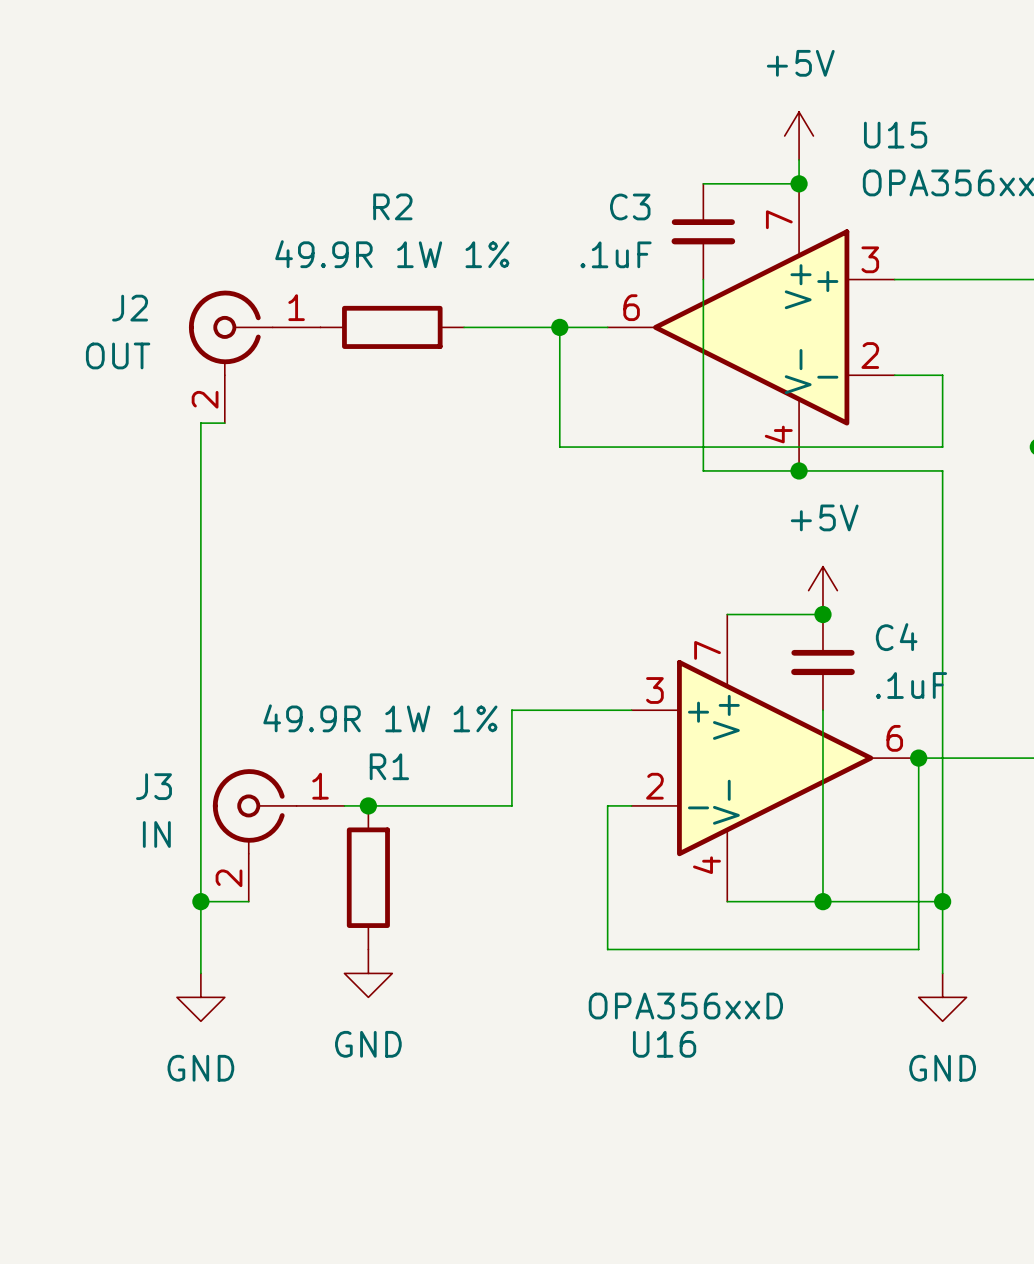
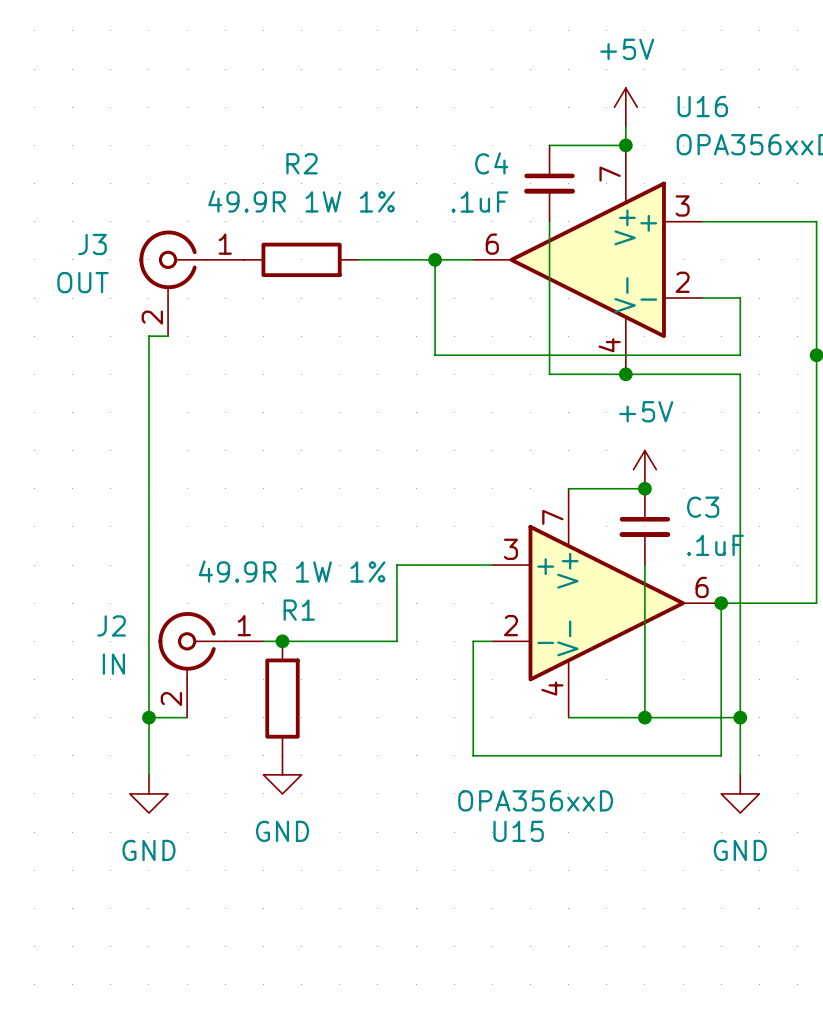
U15 name: U15 (895, 135) -> U16 (702, 106)
C3 name: C3 (630, 206) -> C4 (491, 163)
J2 name: J2 (130, 308) -> J3 (92, 244)
C4 name: C4 (896, 637) -> C3 (703, 507)
J3 name: J3 (153, 786) -> J2 (111, 625)
U16 name: U16 (664, 1044) -> U15 (518, 831)

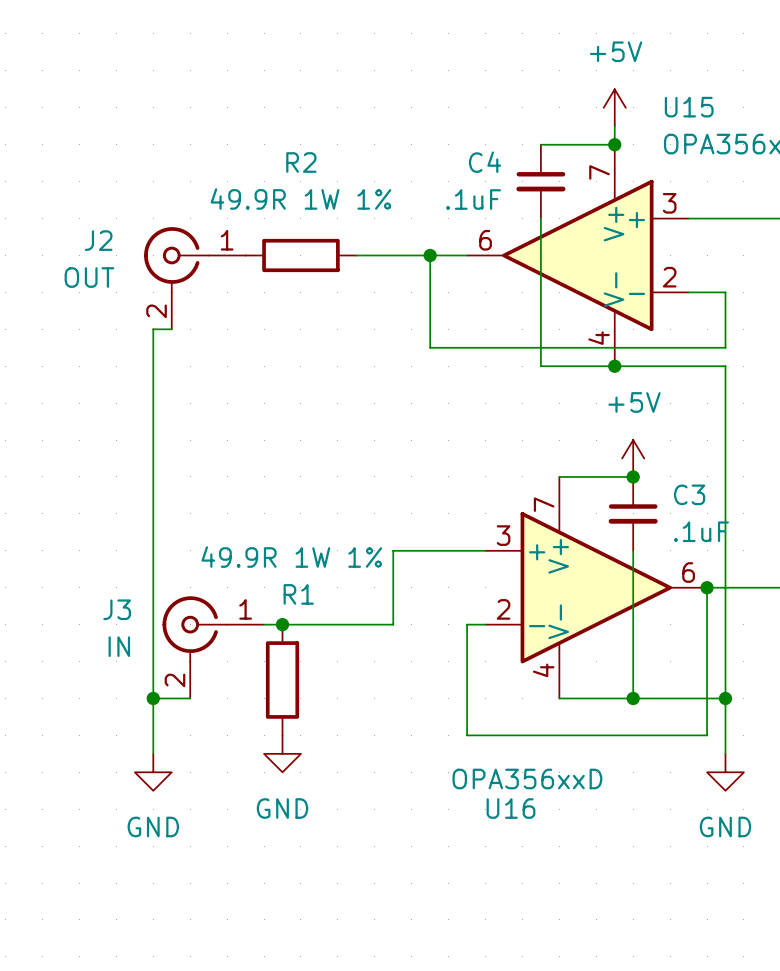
U16 name: U16 (702, 106) -> U15 (689, 107)
J3 name: J3 (92, 244) -> J2 (98, 240)
J2 name: J2 (111, 625) -> J3 (117, 609)
U15 name: U15 (518, 831) -> U16 (510, 808)

